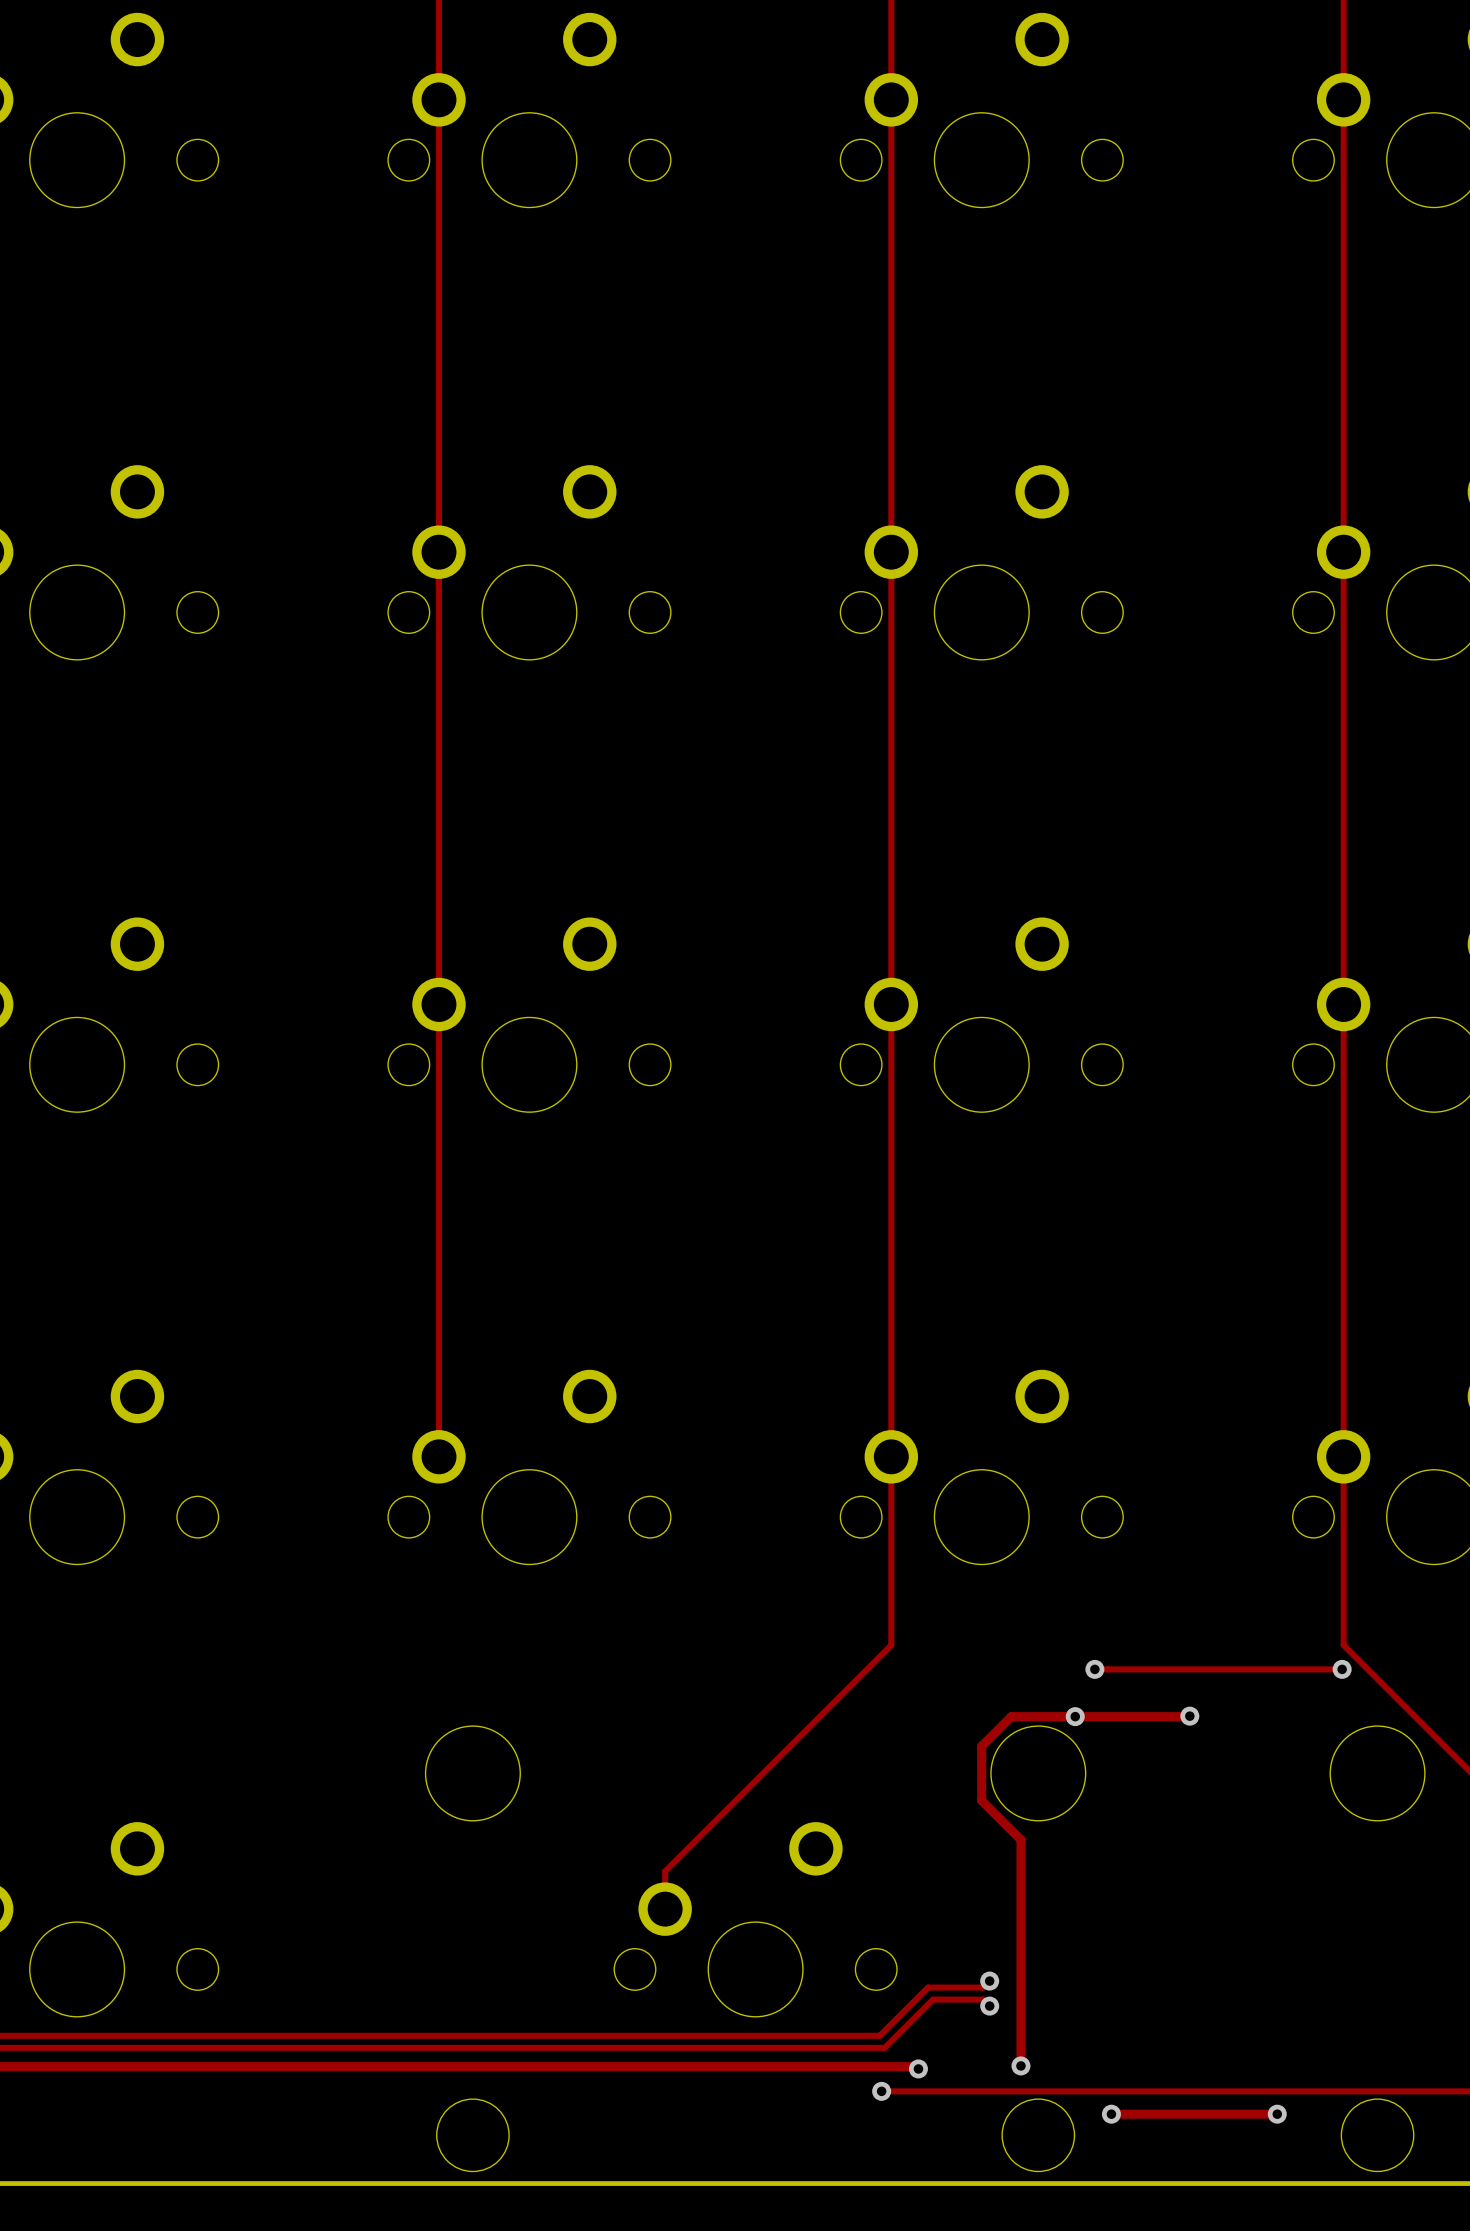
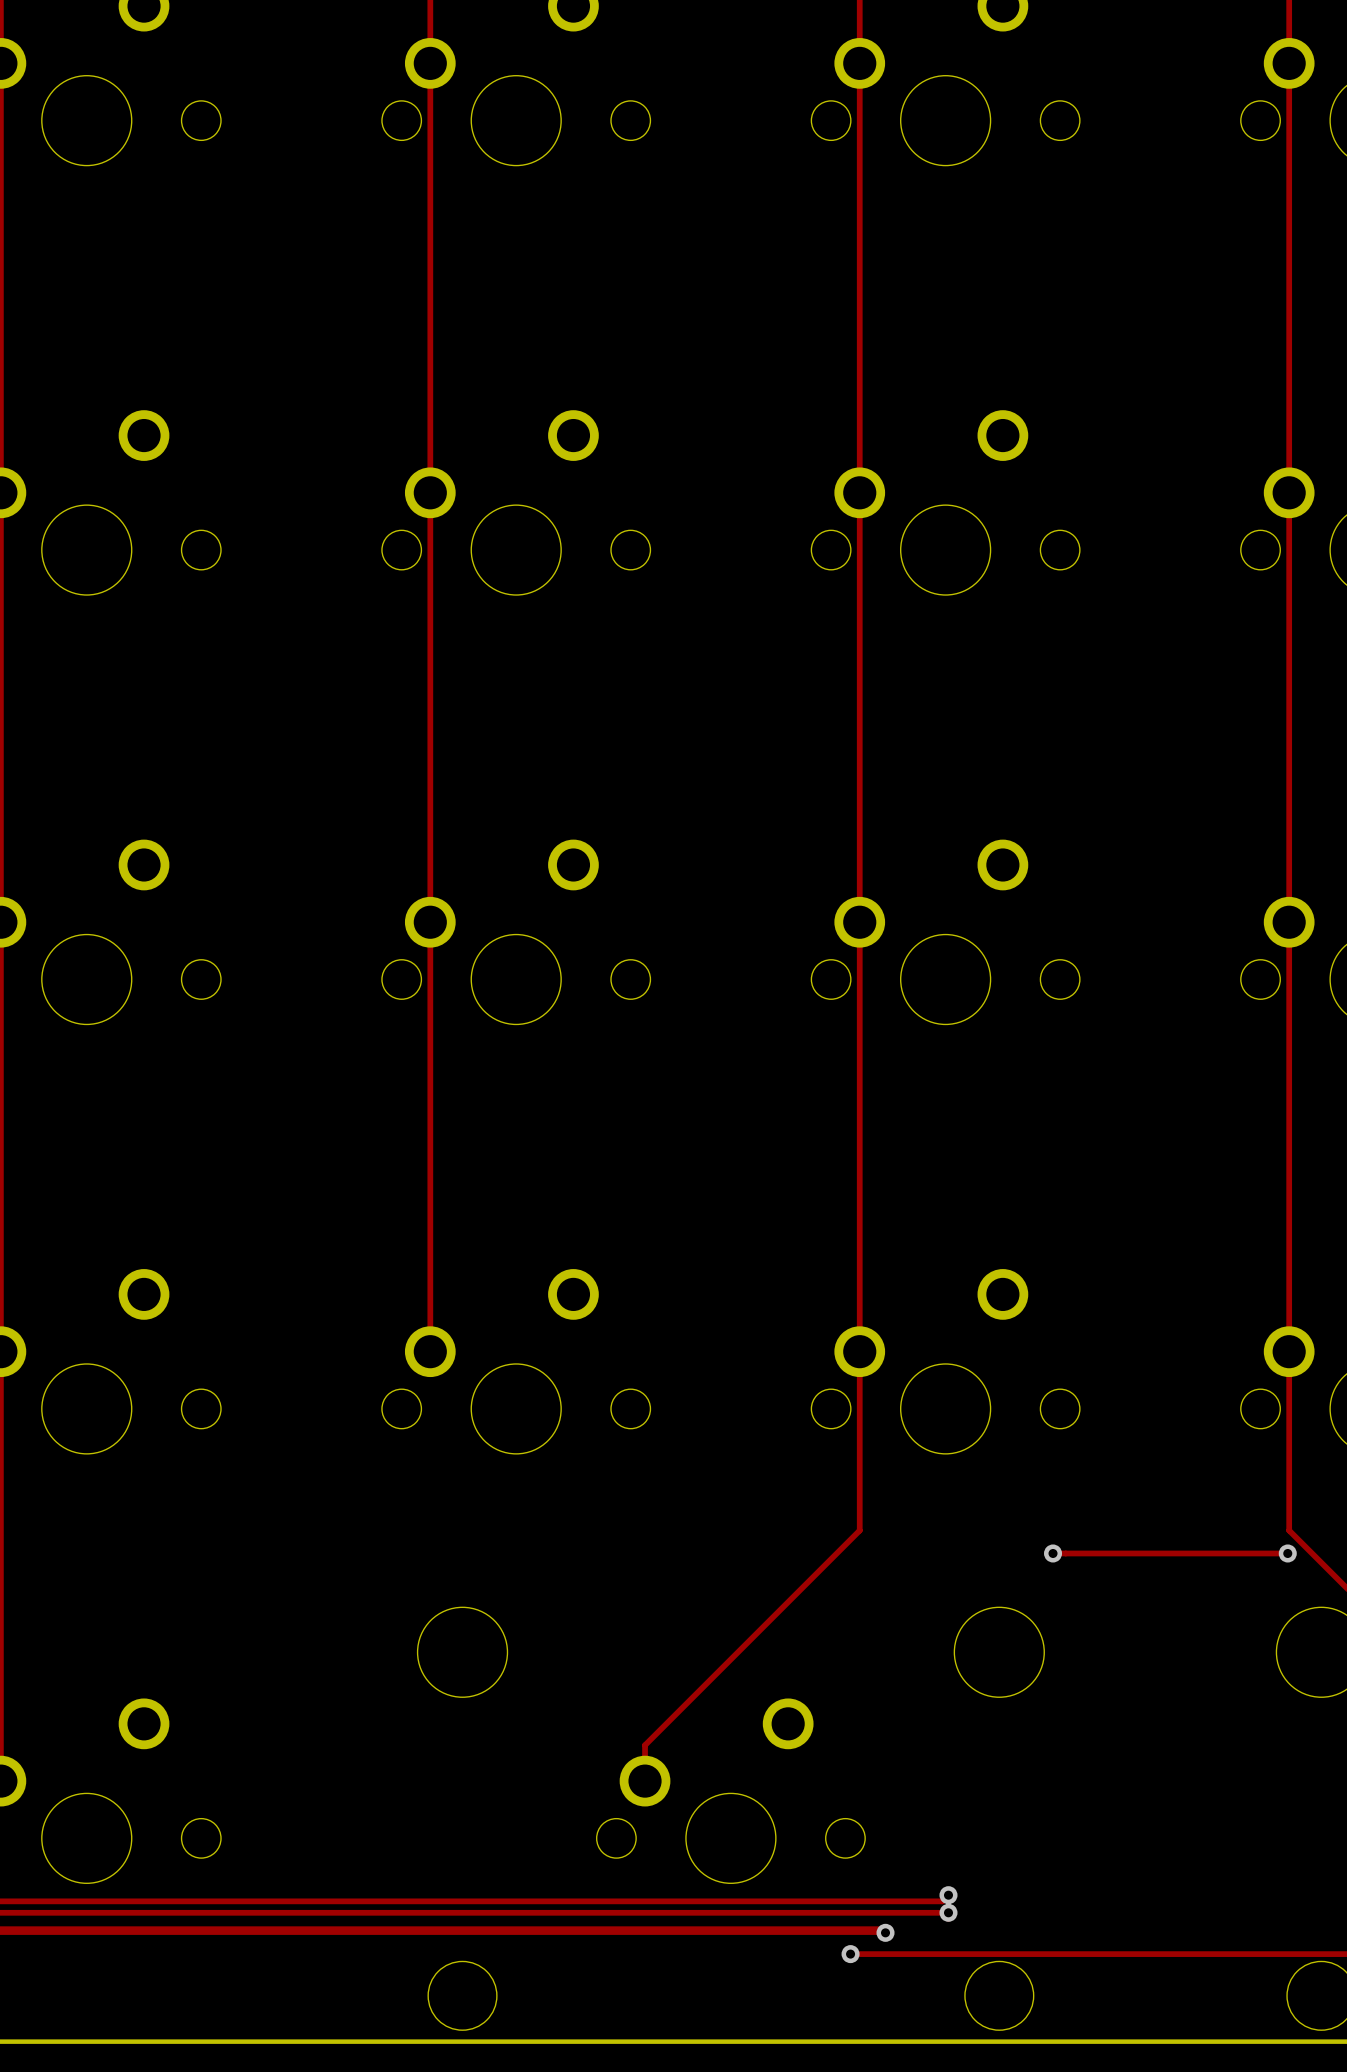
via: (1075, 1716) -> none
track: (1189, 1716) (1011, 1716) (981, 1746) (981, 1800) (1020, 1839) (1020, 2065) -> none
via: (1189, 1716) -> none
track: (989, 1981) (983, 1987) (928, 1987) (879, 2035) -> (948, 1895) (942, 1901) (848, 1901)
via: (989, 1981) -> none
track: (989, 2006) (983, 1999) (933, 1999) (884, 2047) -> (948, 1918) (942, 1912) (853, 1912)
via: (989, 2006) -> none
via: none -> (948, 1895)
via: none -> (948, 1912)
via: (1020, 2065) -> none
track: (1111, 2114) (1277, 2114) -> none
via: (1111, 2114) -> none
via: (1277, 2114) -> none

